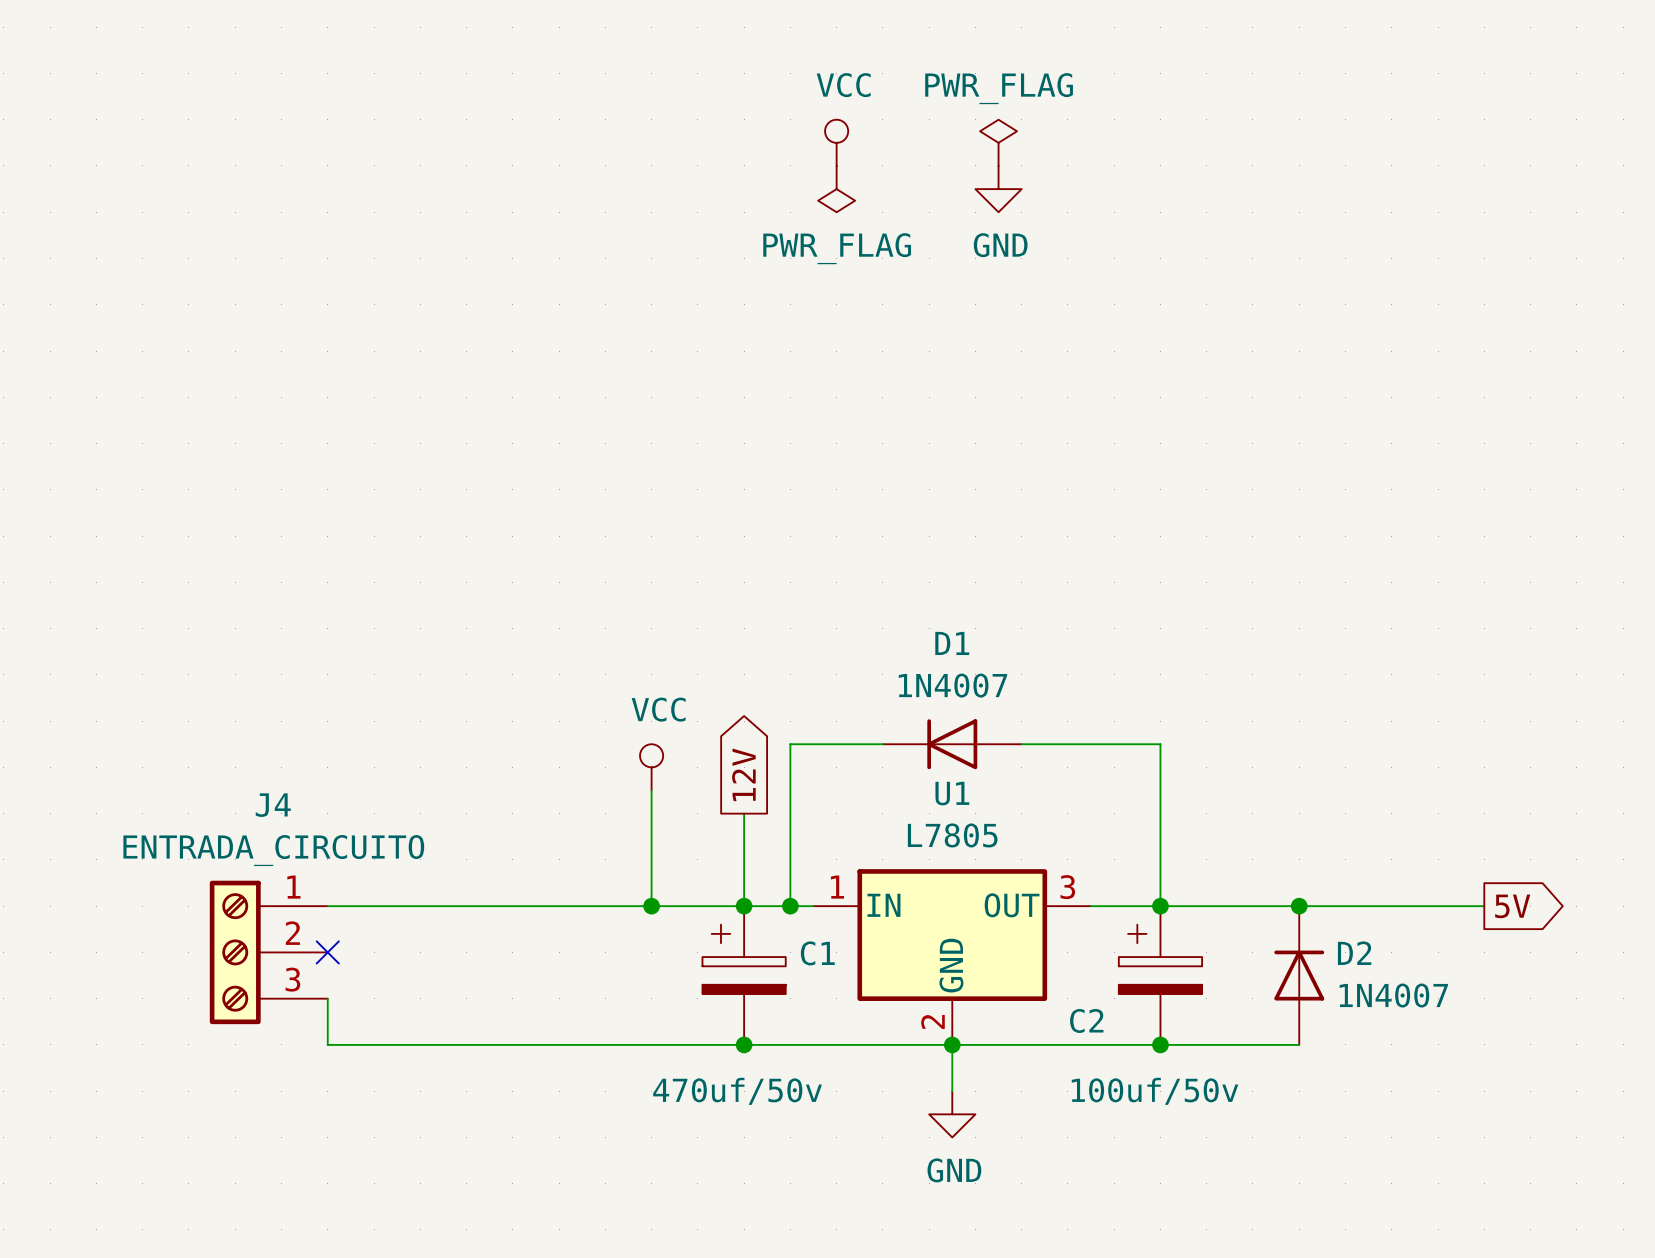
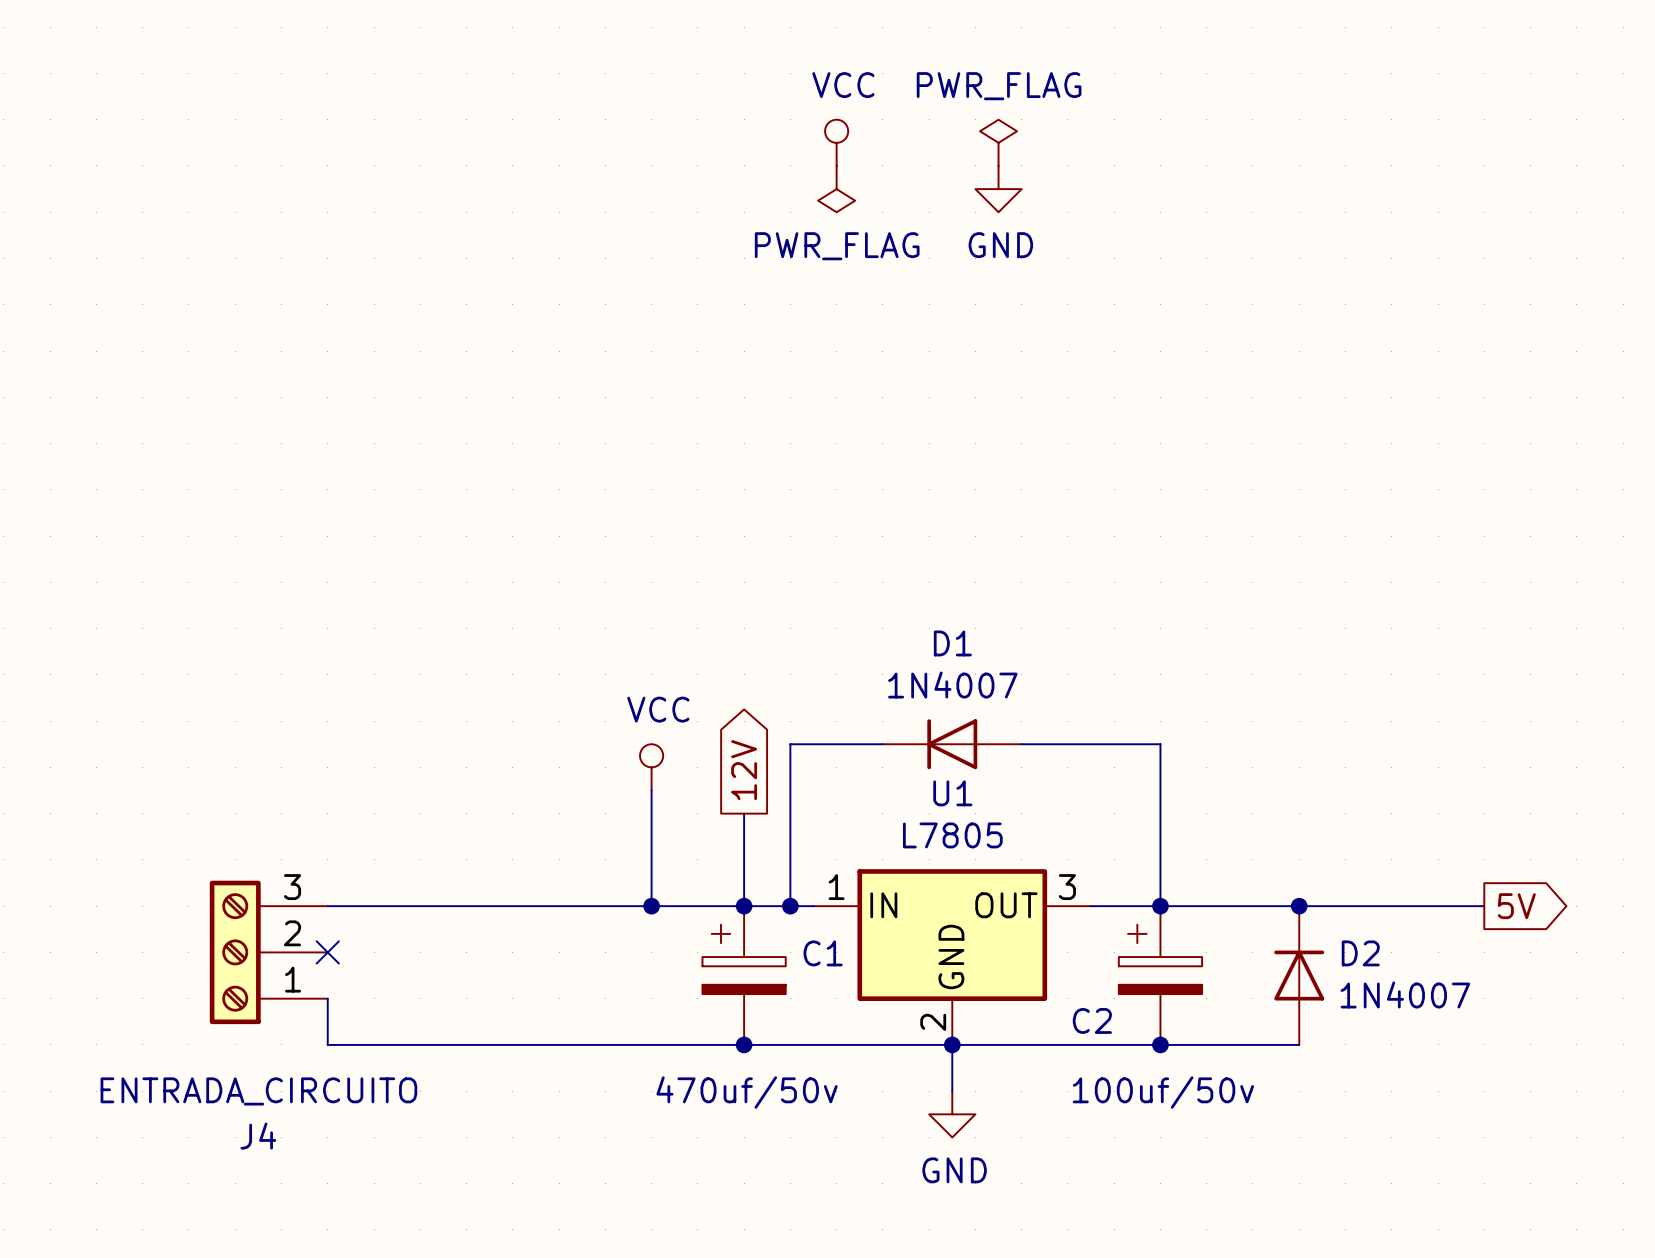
J4 name position: J4 (273, 805) -> J4 (258, 1136)
J4 value position: ENTRADA_CIRCUITO (273, 850) -> ENTRADA_CIRCUITO (258, 1091)
J4 flip: as is (235, 952) -> up-down (235, 952)

